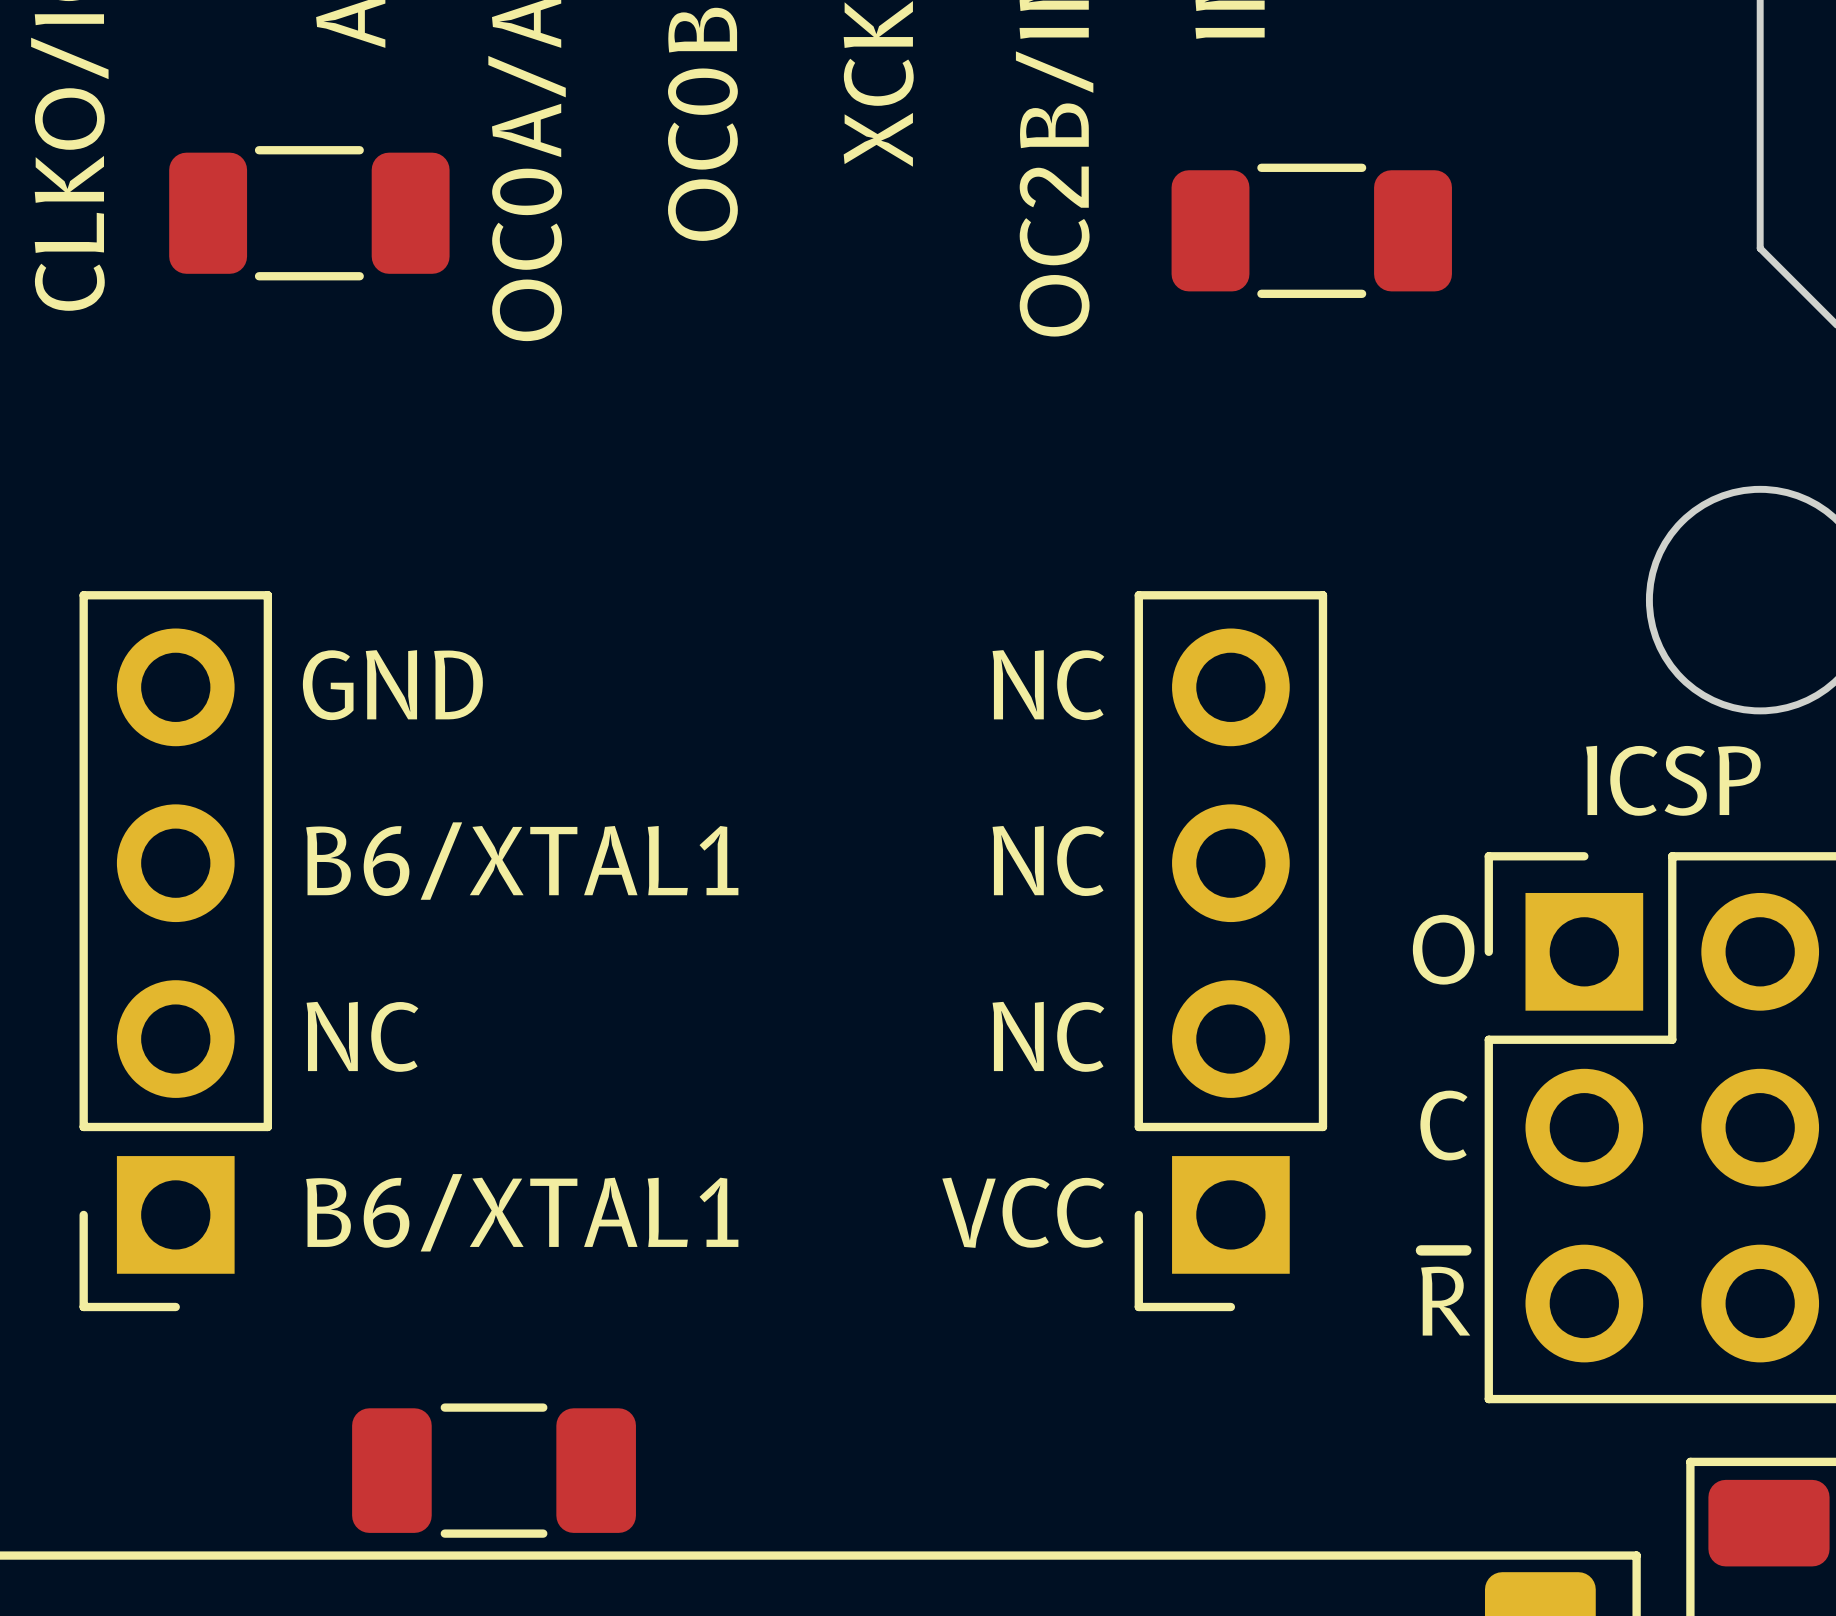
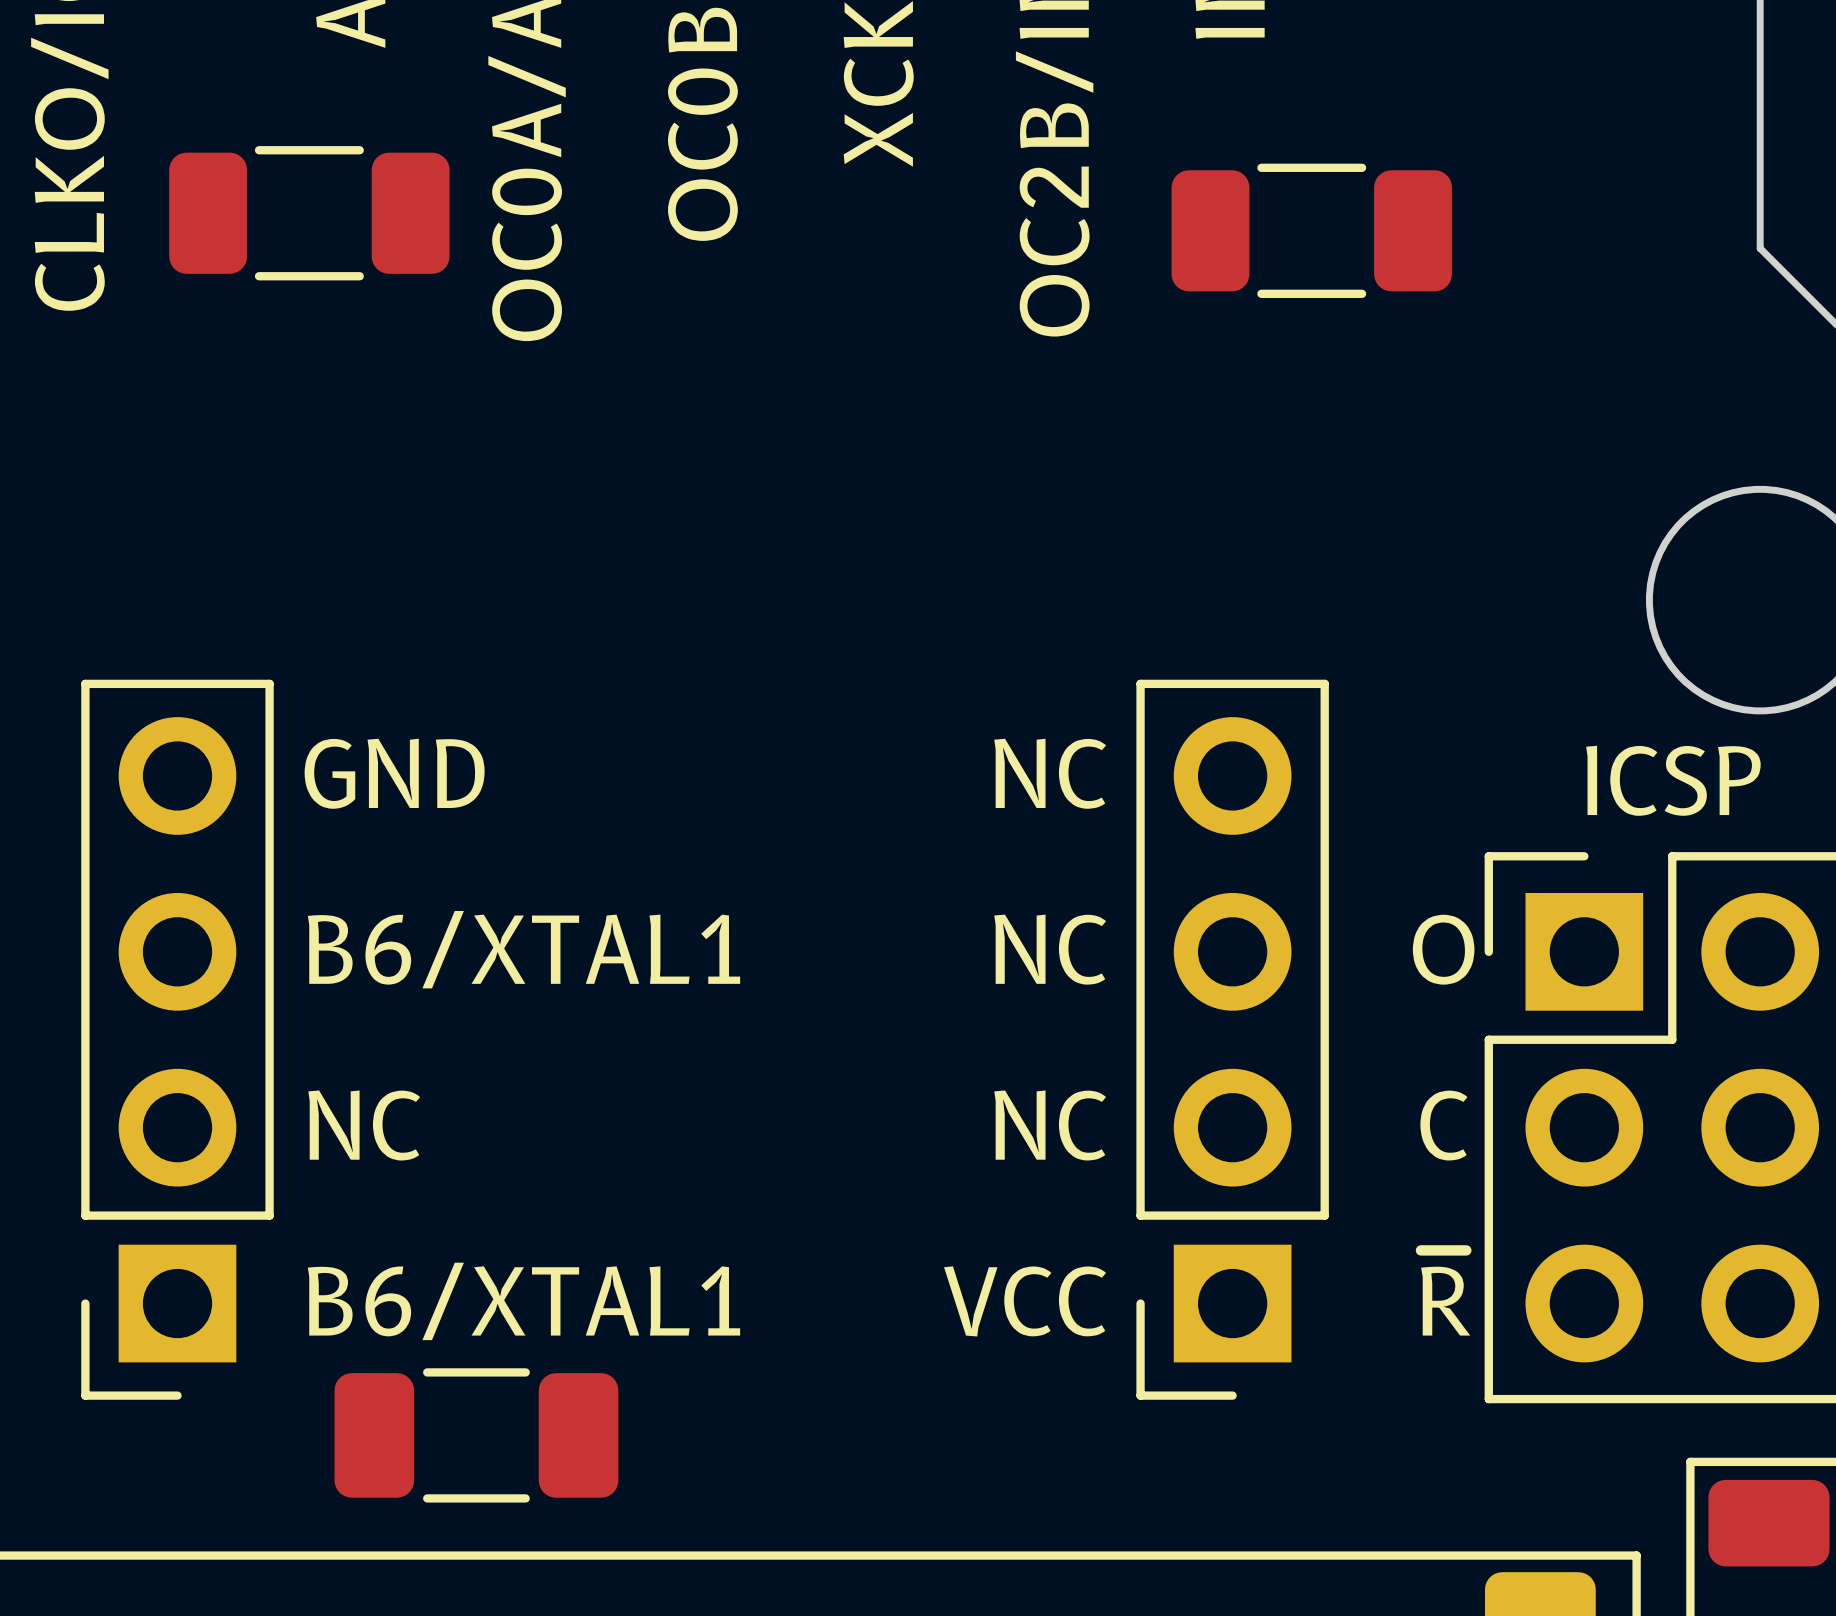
text position: GND (392, 685) -> GND (394, 773)
text: NC (1048, 685) -> none
text: none -> NC (1050, 773)
text position: B6/XTAL1 (522, 861) -> B6/XTAL1 (524, 949)
text: NC (1048, 861) -> none
text: none -> NC (1050, 949)
part position: (175, 951) -> (177, 1039)
part position: (1230, 951) -> (1232, 1039)
text position: NC (362, 1036) -> NC (364, 1125)
text: NC (1048, 1036) -> none
text: none -> NC (1050, 1125)
text position: B6/XTAL1 (522, 1212) -> B6/XTAL1 (524, 1301)
text position: VCC (1023, 1212) -> VCC (1025, 1301)
part position: (494, 1470) -> (476, 1435)

